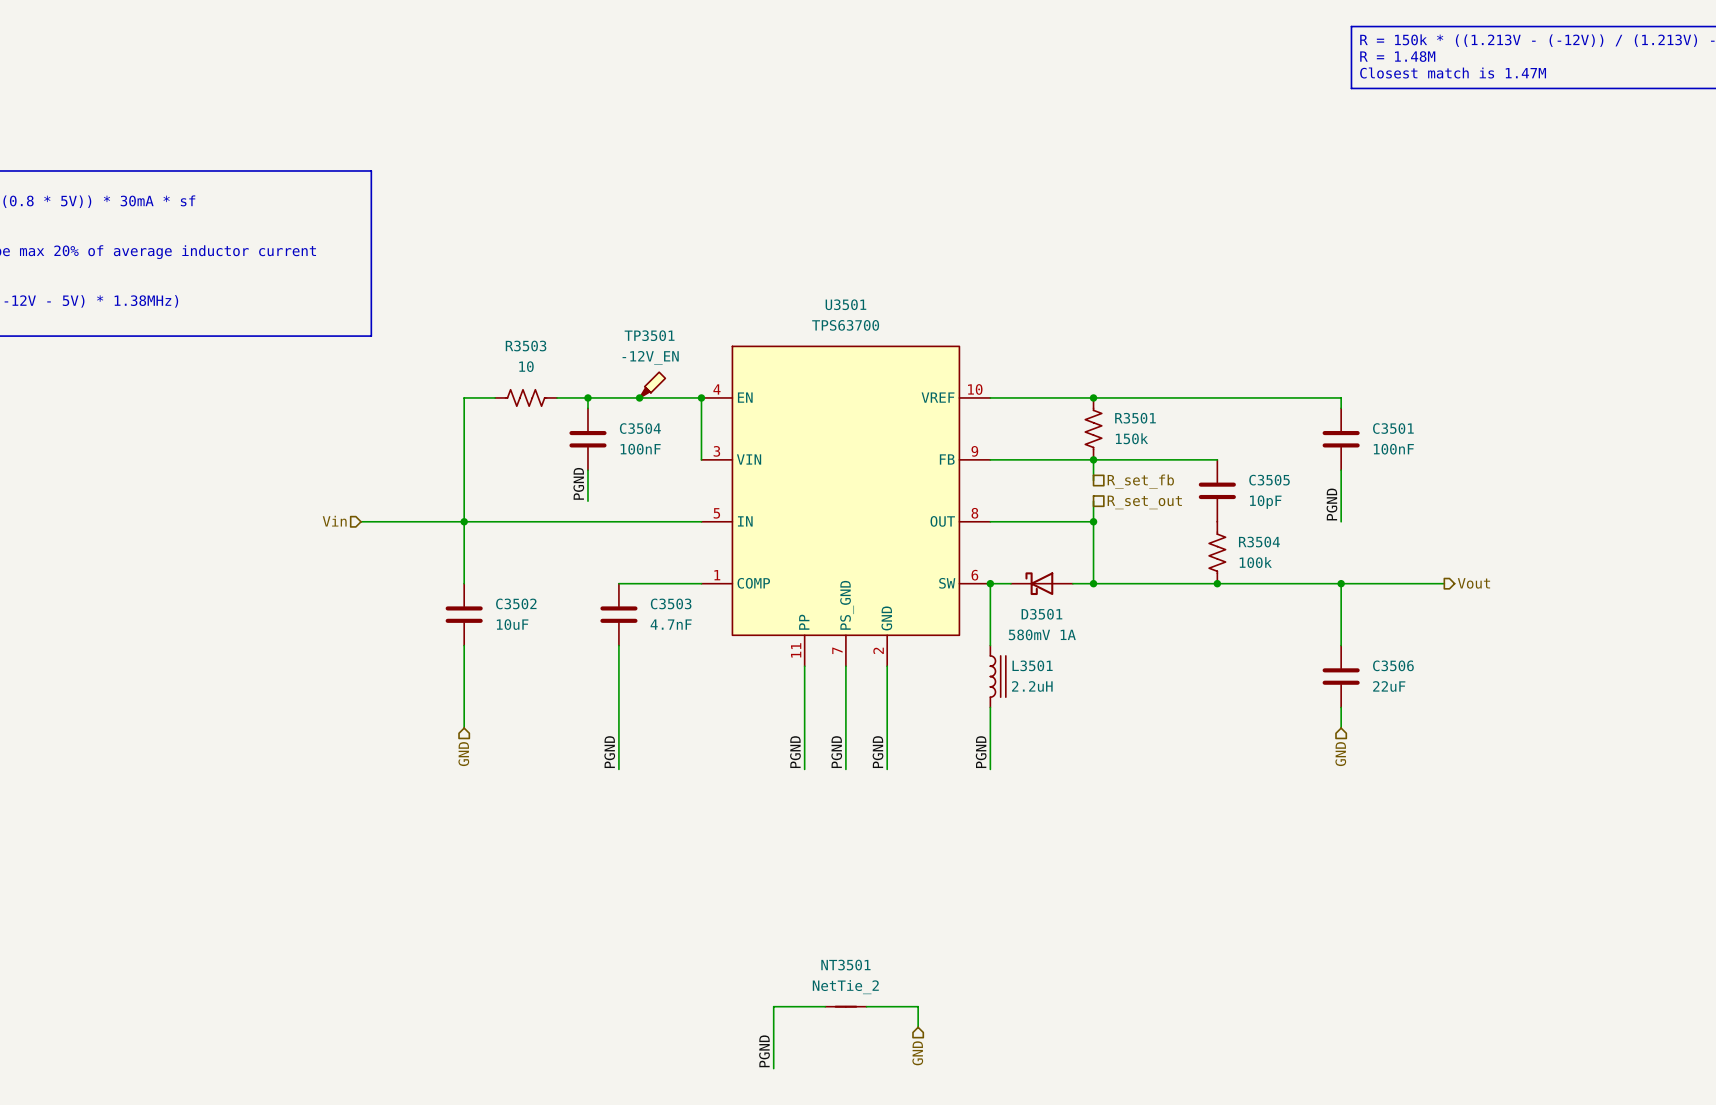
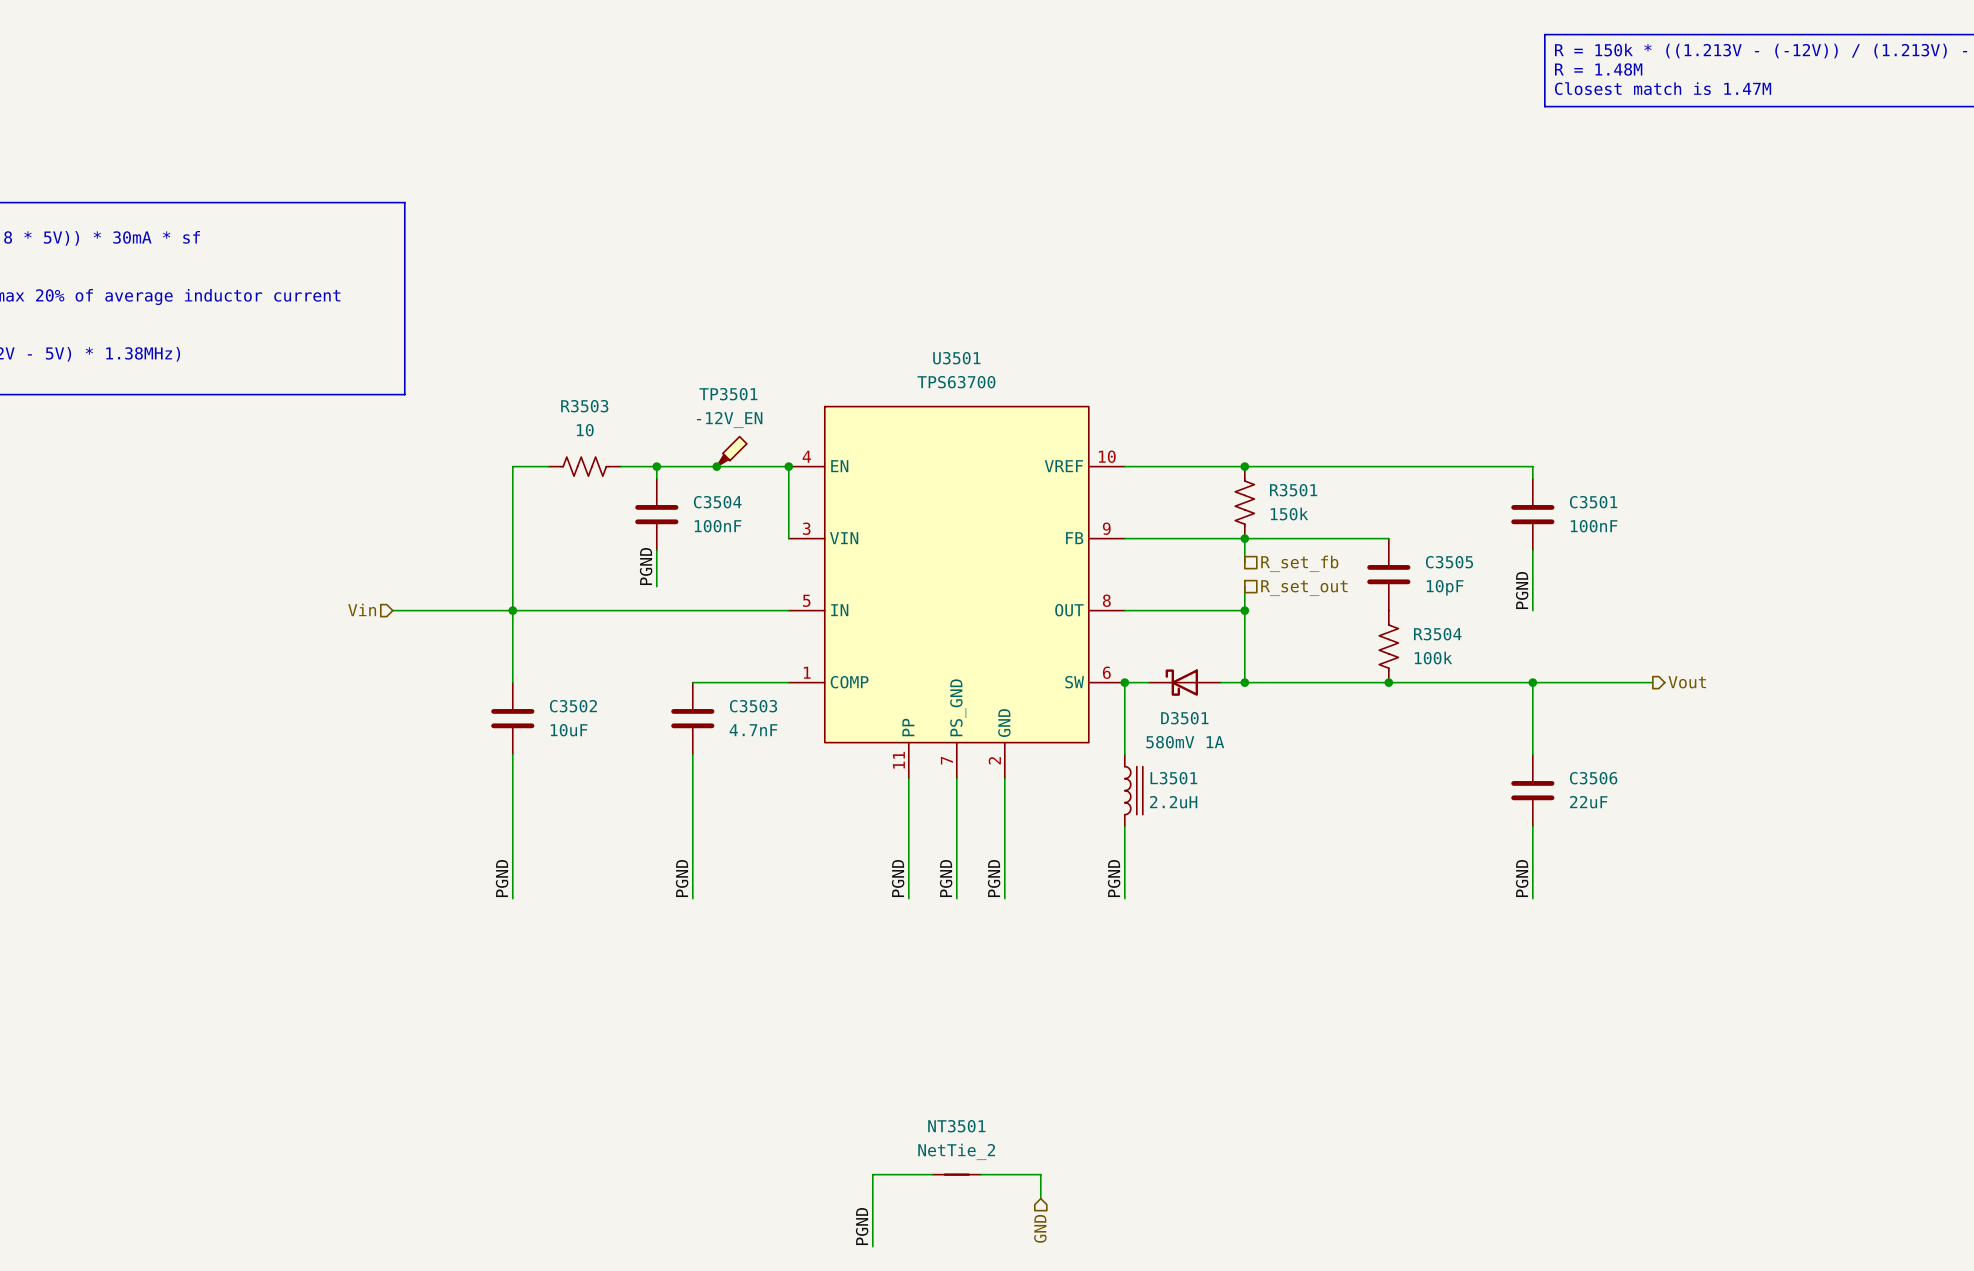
wire: none -> (512, 850) (512, 898)
wire: none -> (1532, 850) (1532, 898)
label: none -> PGND (502, 878)
label: none -> PGND (1522, 878)
hierarchical label: GND (463, 754) -> none
hierarchical label: GND (1340, 754) -> none

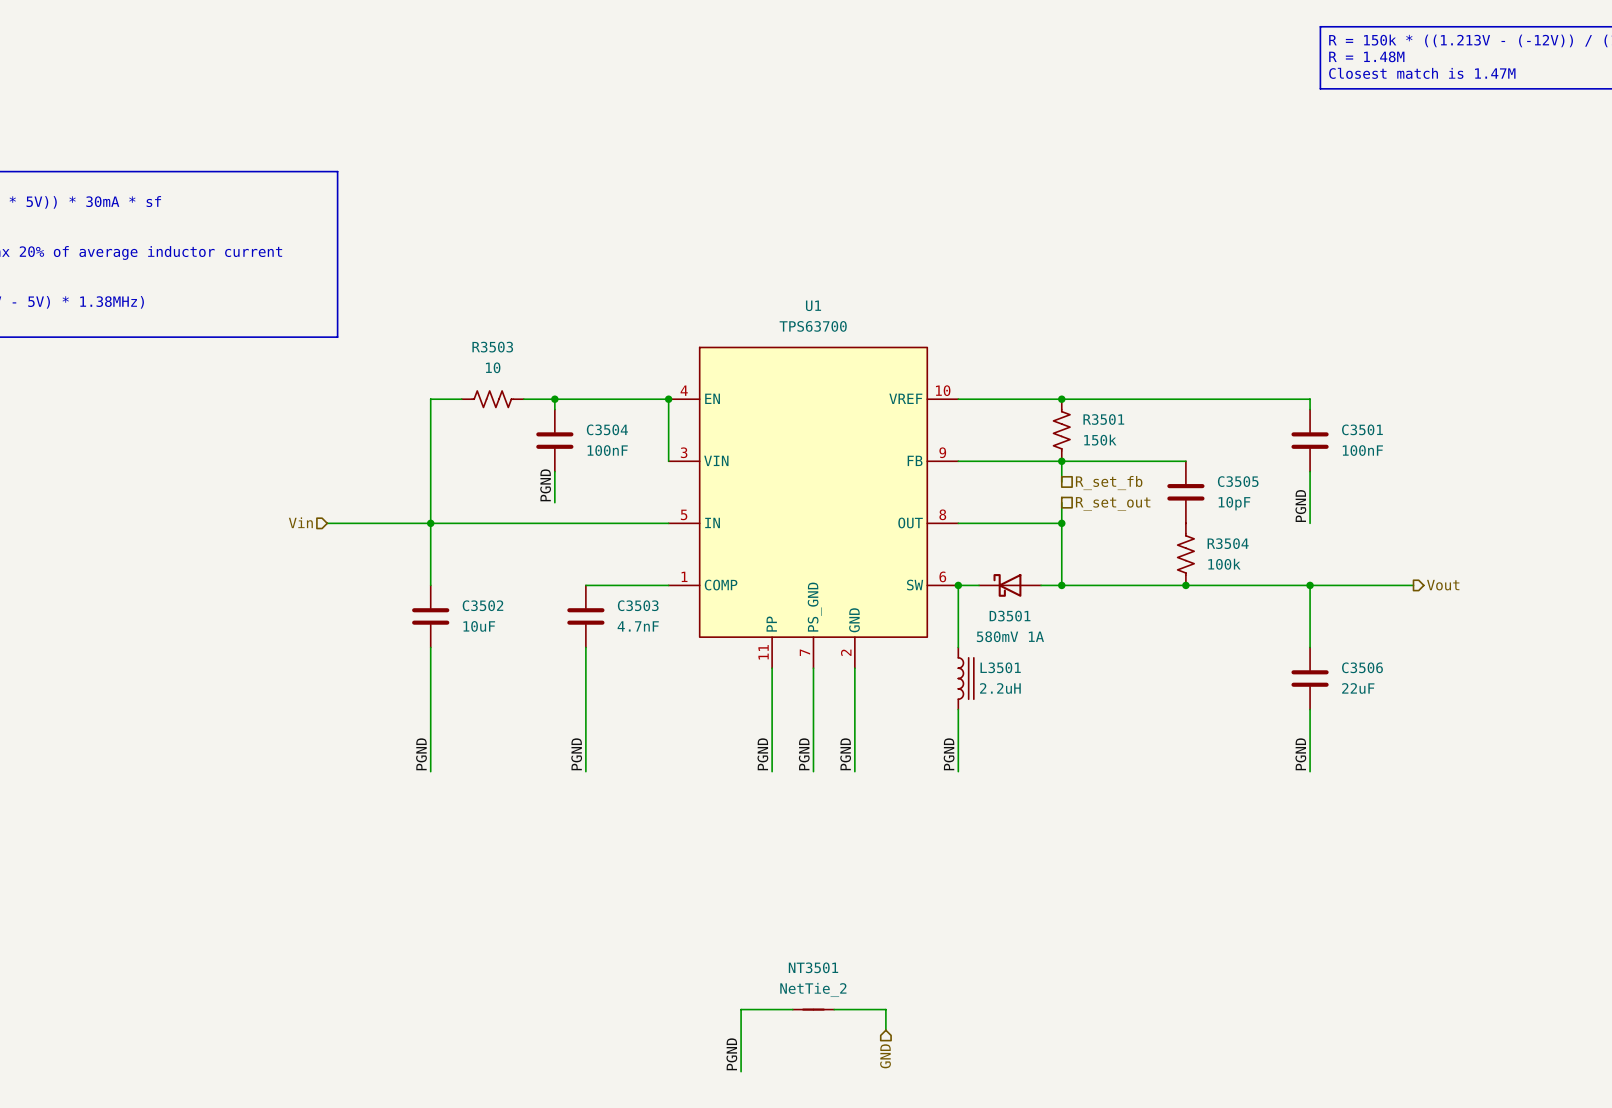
U3501 name: U3501 (956, 358) -> U1 (813, 305)
TP3501: -12V_EN (731, 451) -> none
junction: (716, 466) -> none

